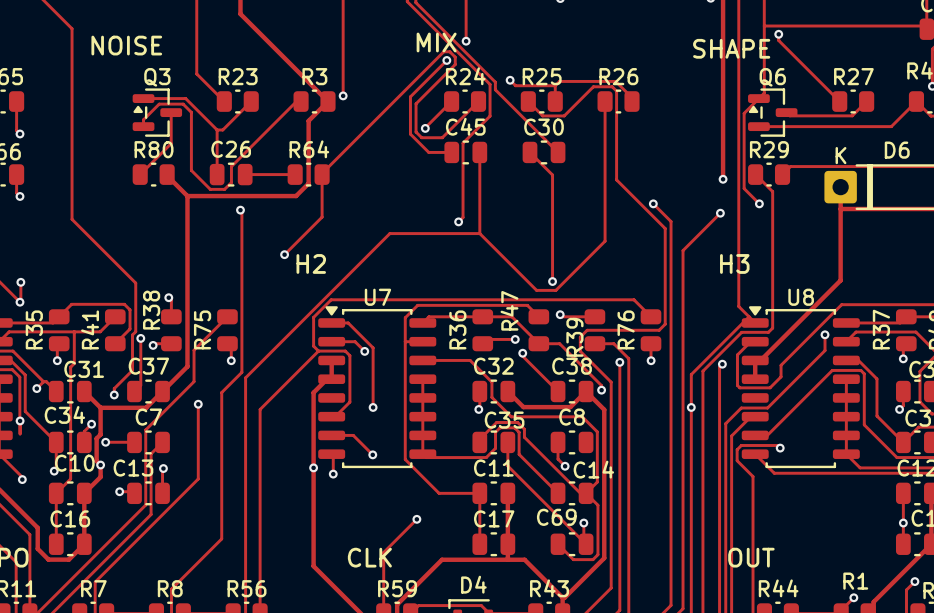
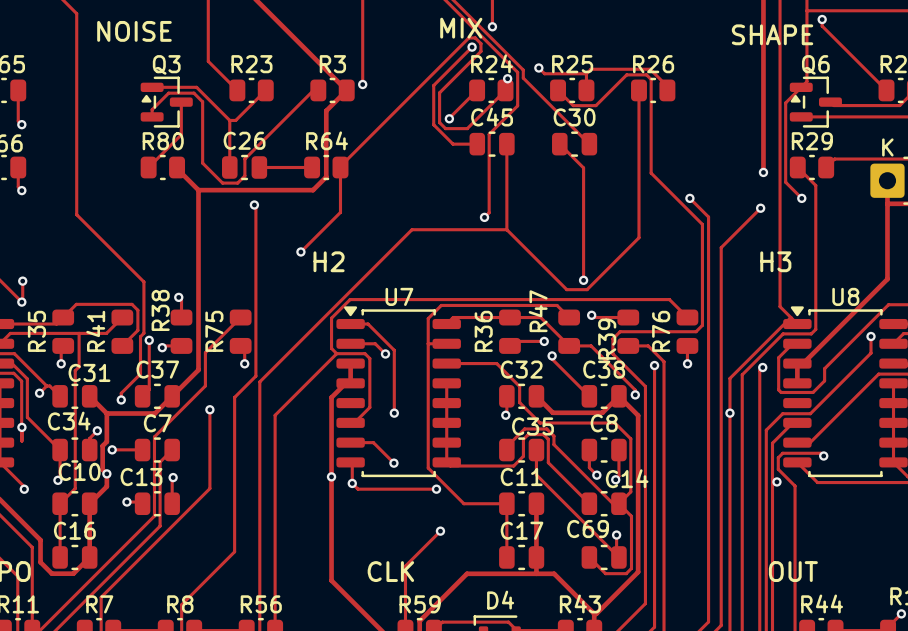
via: none -> (507, 78)
track: none -> (618, 450) (618, 476) (615, 479)
via: none -> (615, 479)
via: none -> (776, 481)
track: none -> (352, 483) (358, 489) (436, 489)
via: none -> (436, 489)

